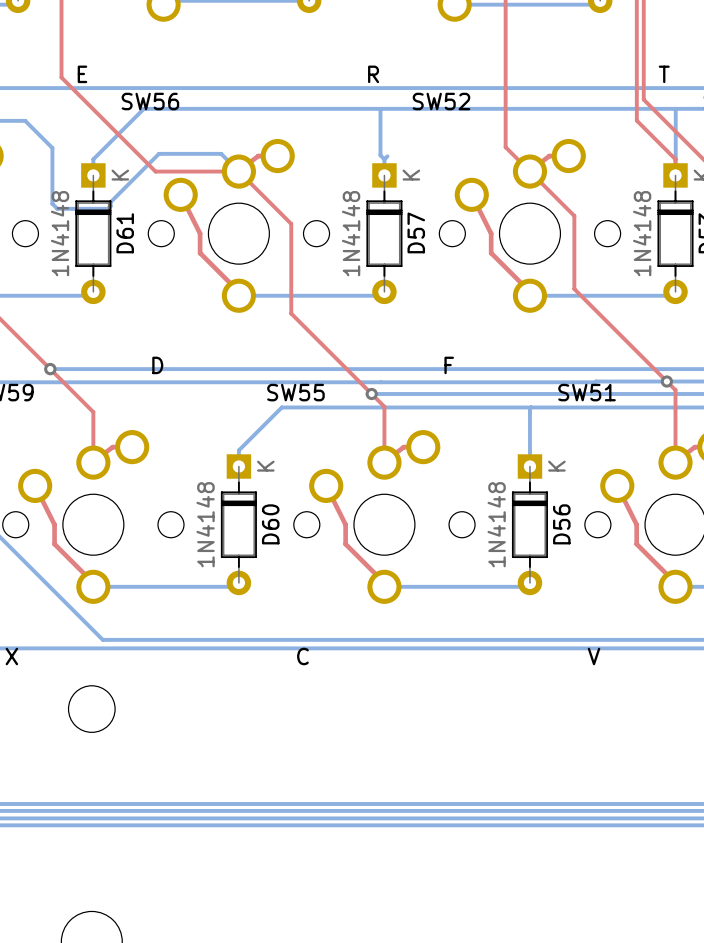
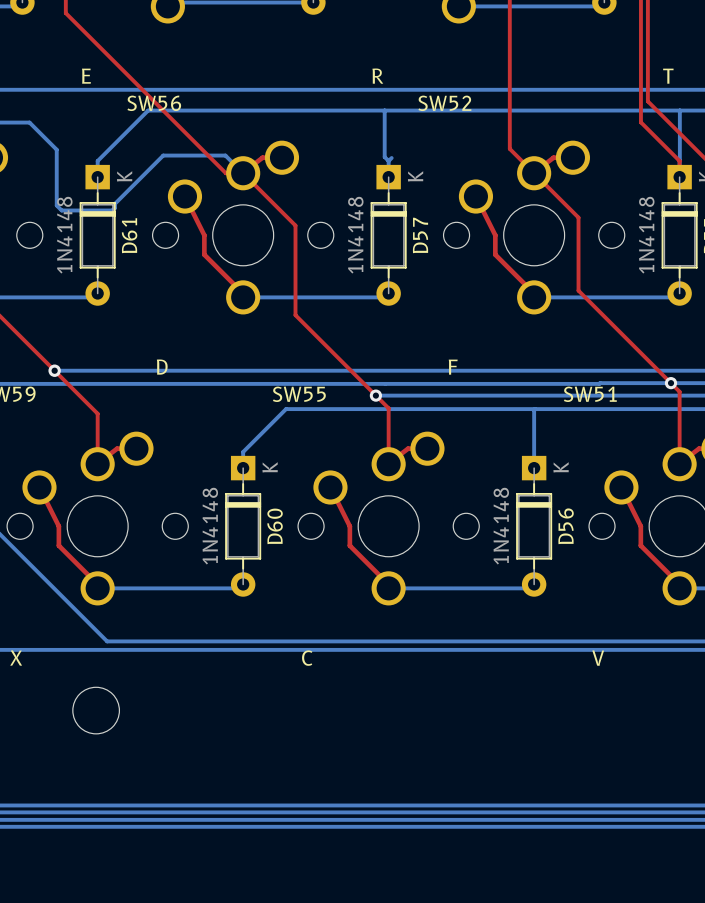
top track: (61, 11) (61, 77) (155, 171) (221, 171) -> (65, 13) (225, 173)

